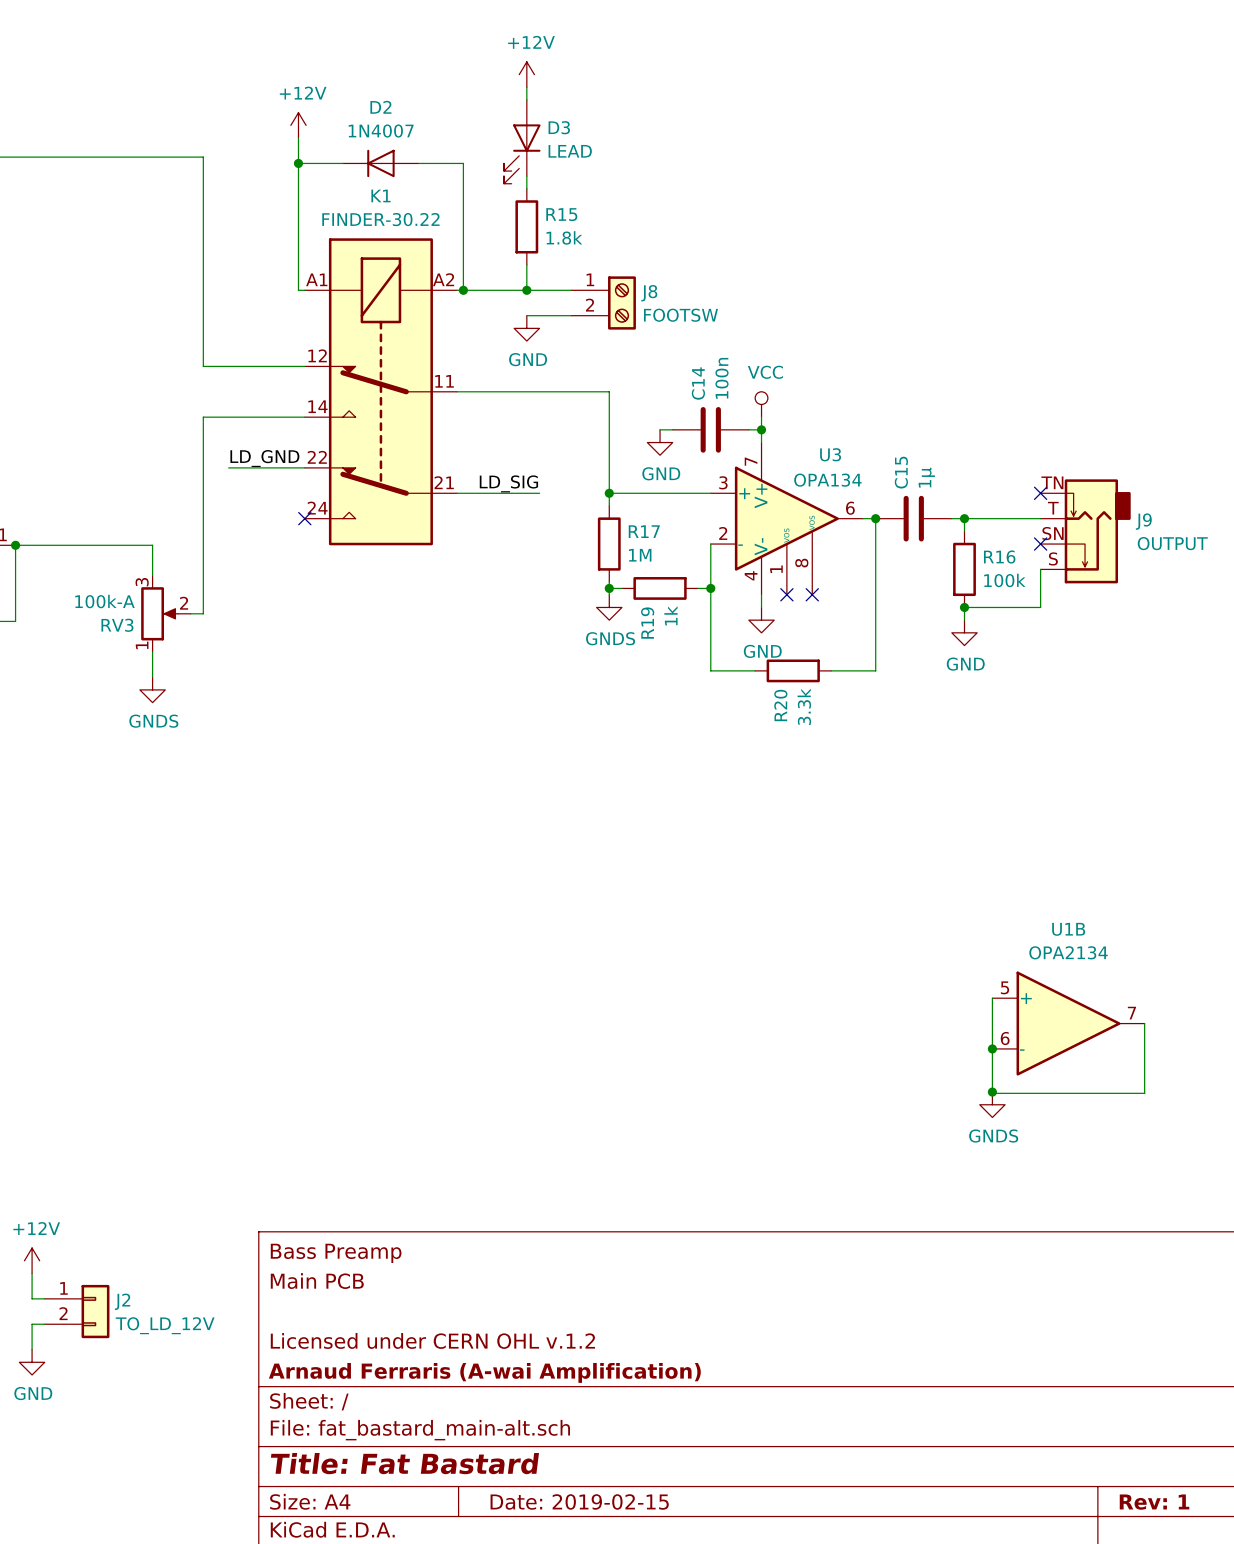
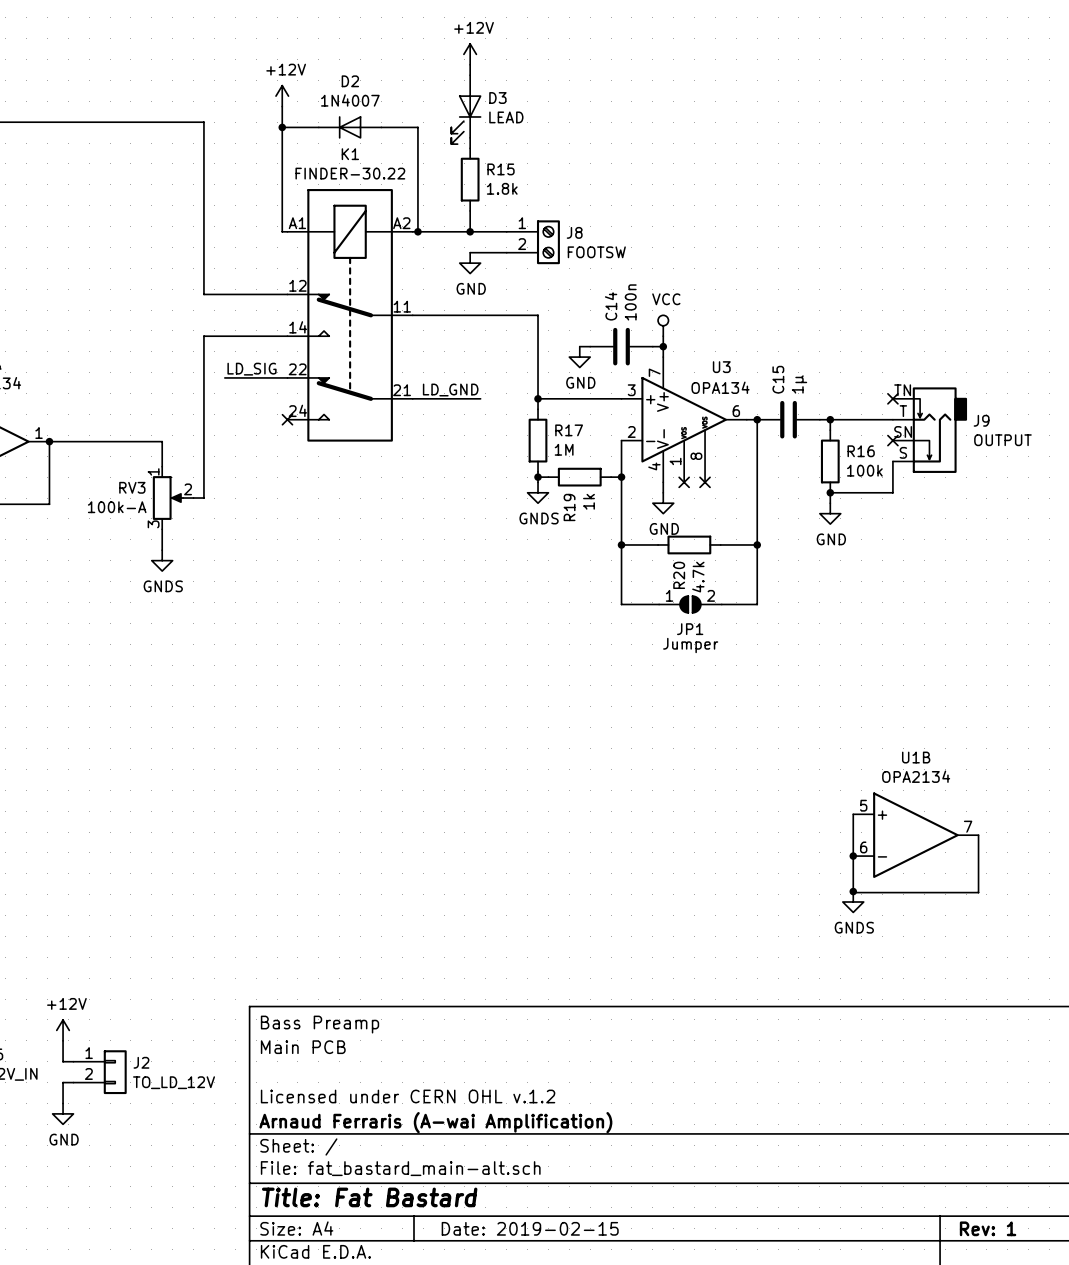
label: LD_GND (264, 458) -> LD_SIG (252, 369)
label: LD_SIG (508, 483) -> LD_GND (450, 390)
RV3 flip: as is (159, 613) -> up-down (167, 498)
wire: none -> (621, 544) (621, 604) (659, 604)
junction: none -> (621, 544)
wire: none -> (757, 544) (757, 604) (721, 604)
junction: none -> (757, 544)
R20 value: 3.3k (804, 706) -> 4.7k (698, 577)
JP1: none -> Jumper (690, 604)

